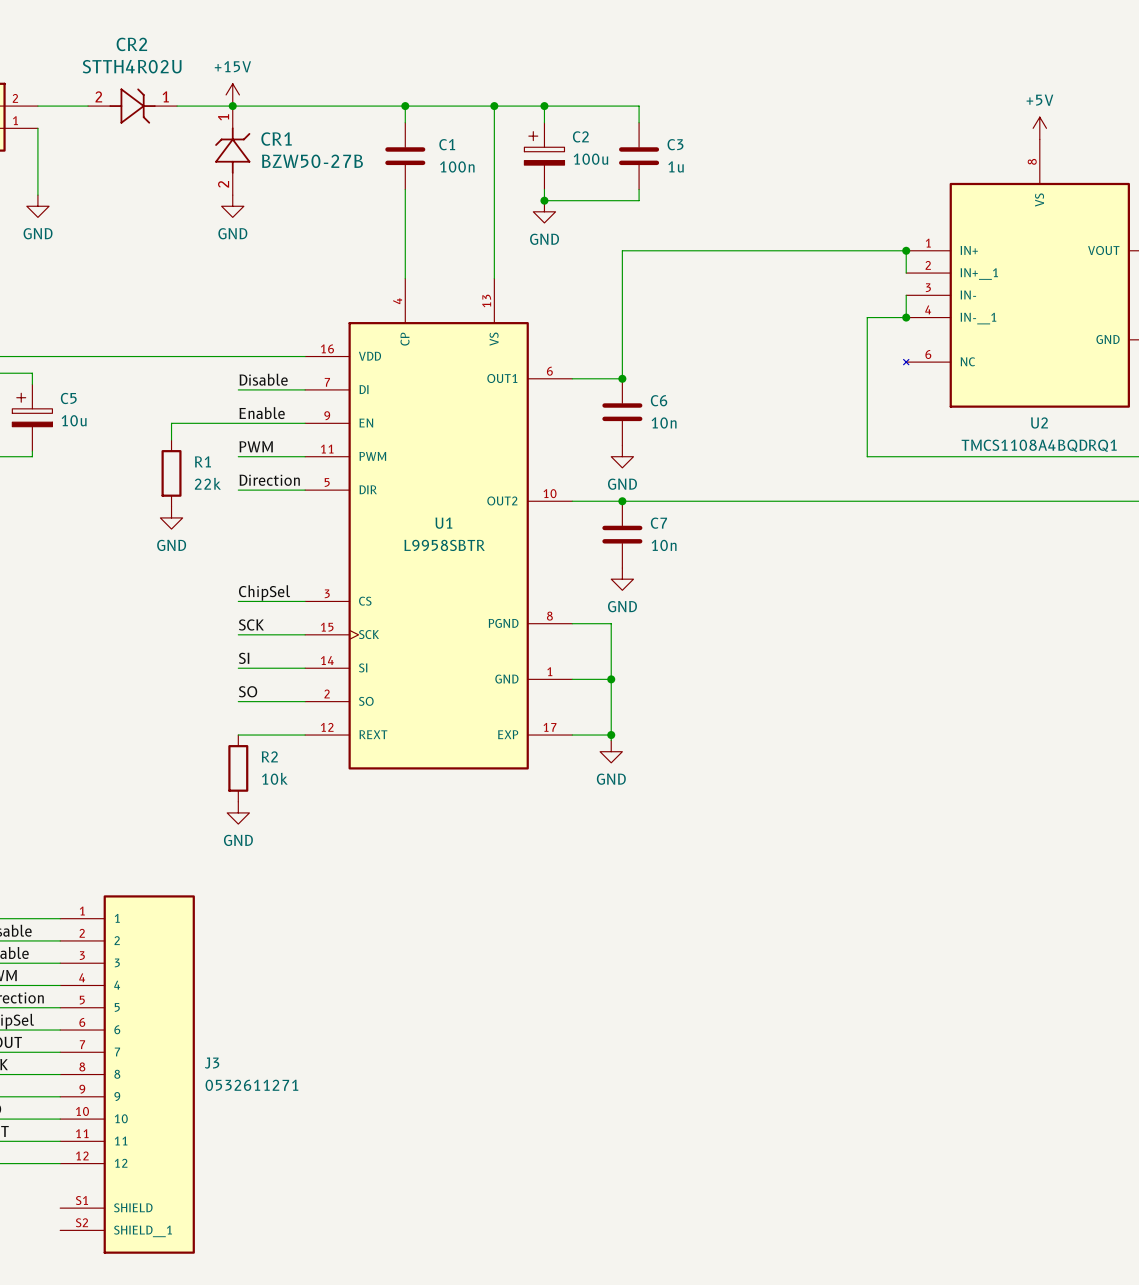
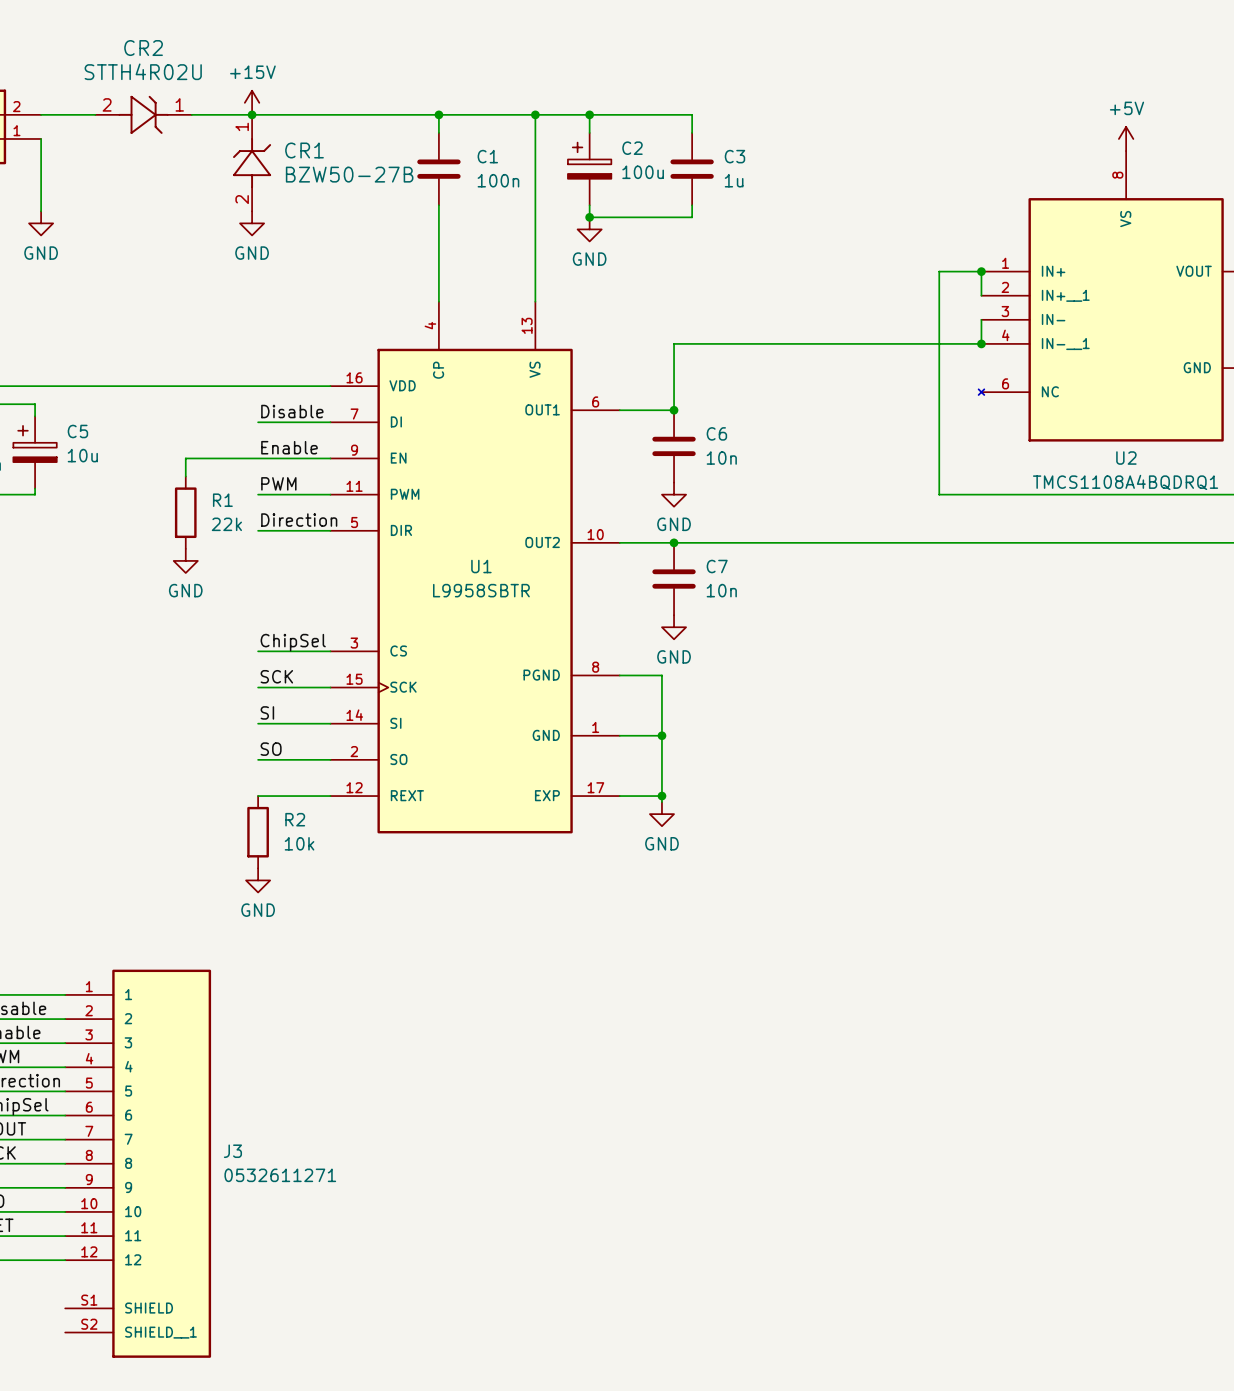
wire: (867, 250) (622, 250) (622, 317) -> (939, 271) (939, 343) (674, 343)

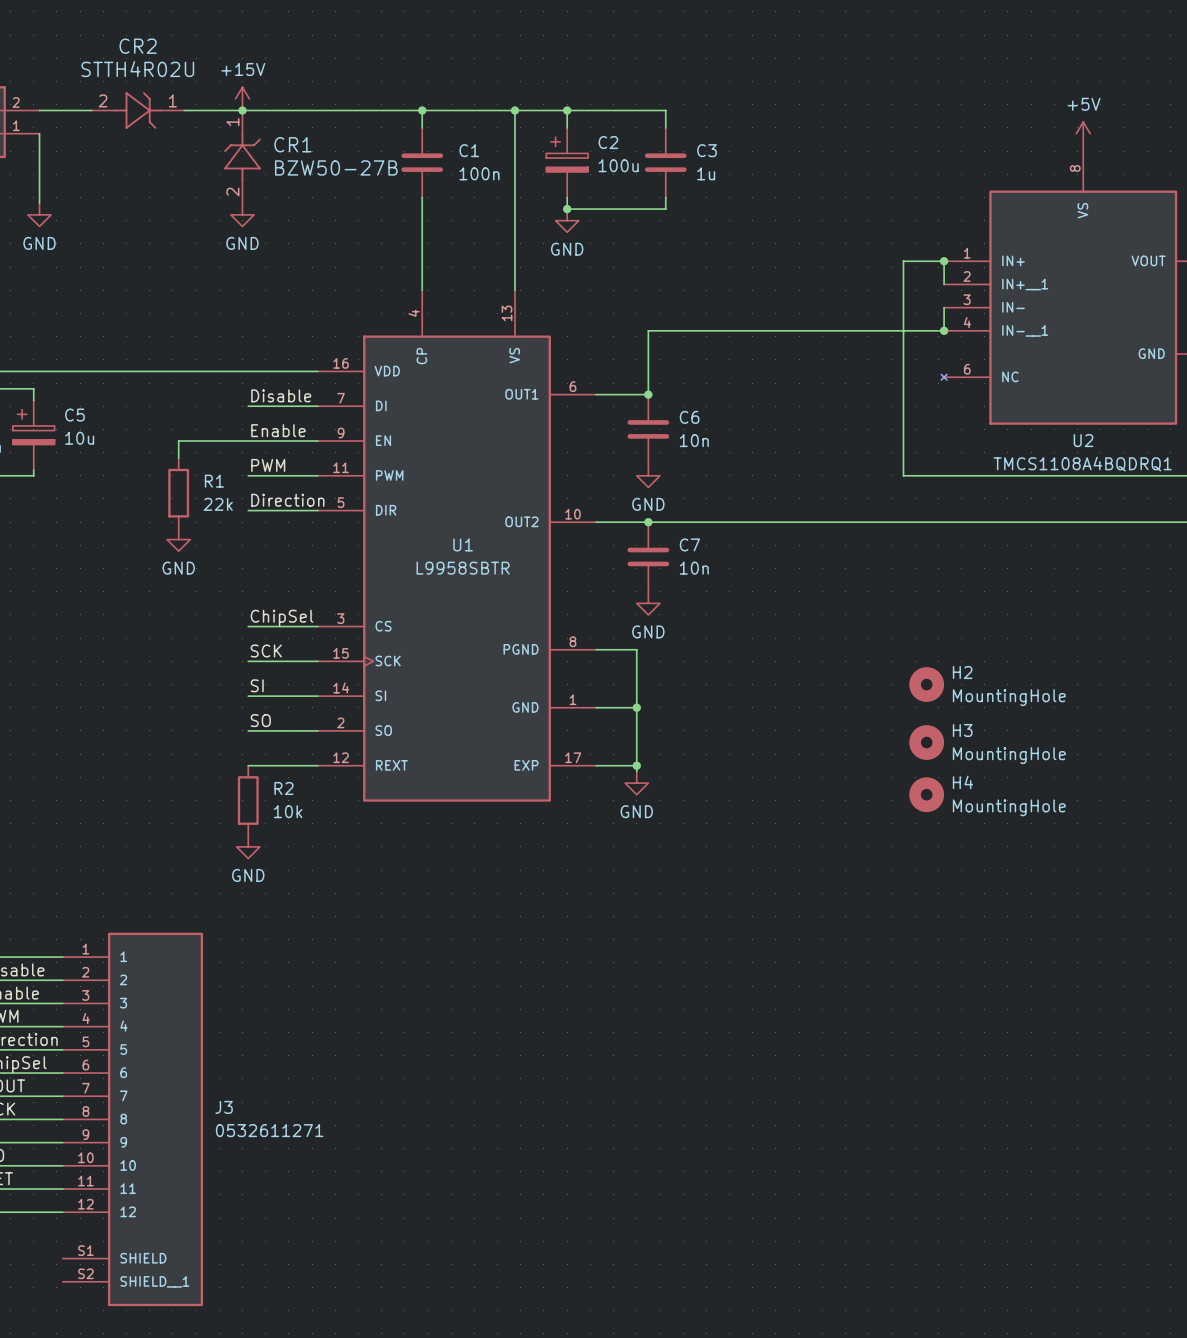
H2: none -> MountingHole (926, 684)
H3: none -> MountingHole (926, 742)
H4: none -> MountingHole (926, 794)

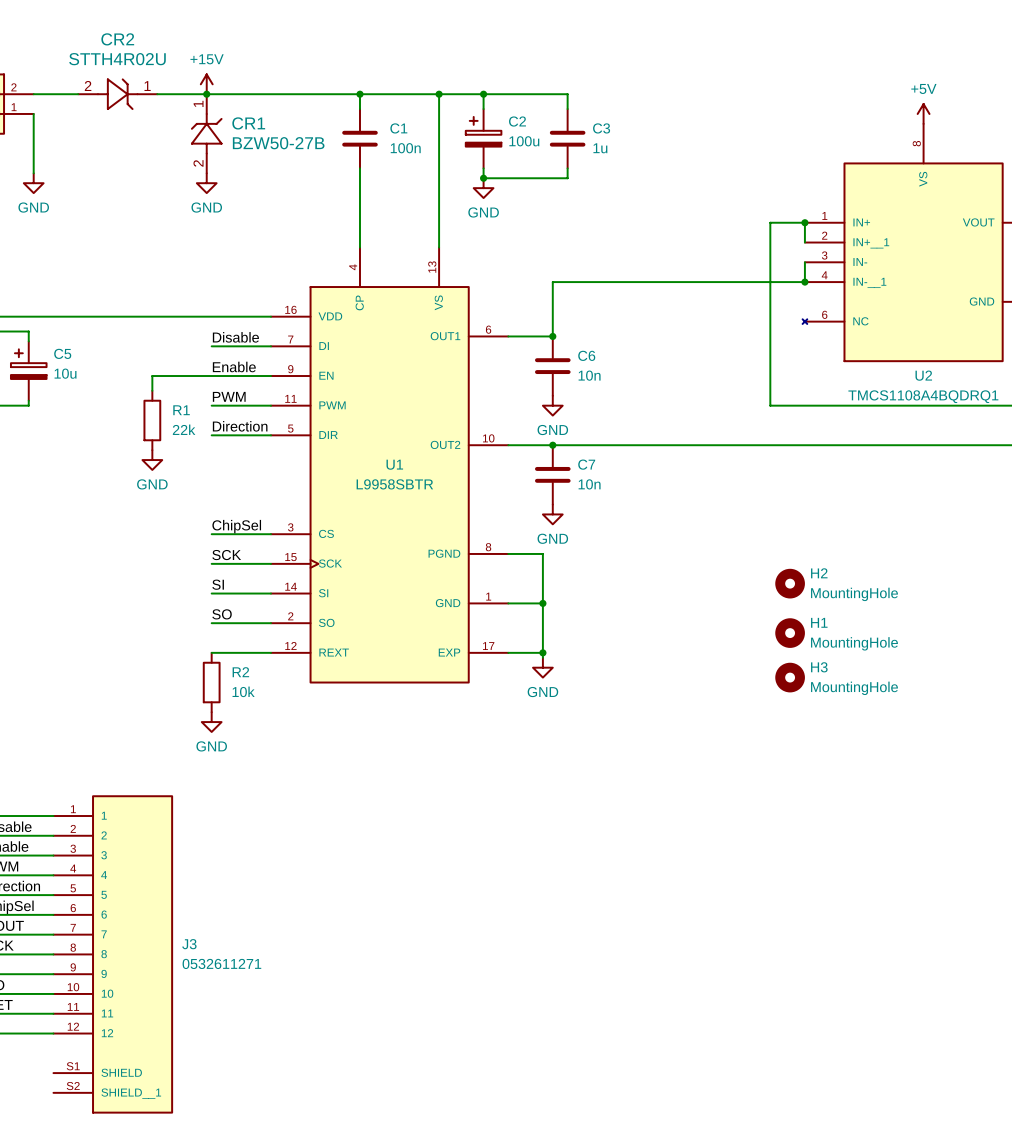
H3 name: H3 (962, 730) -> H1 (819, 622)
H4 name: H4 (962, 782) -> H3 (819, 667)

